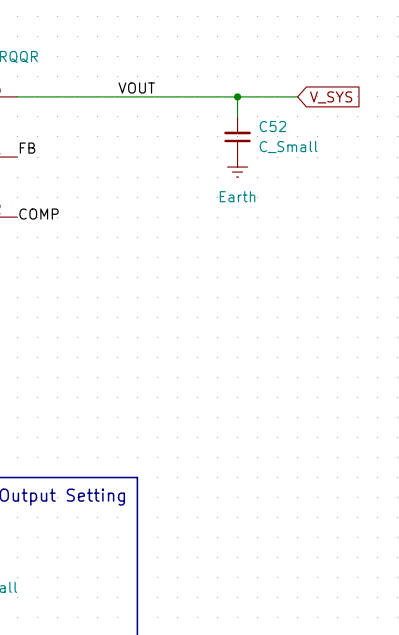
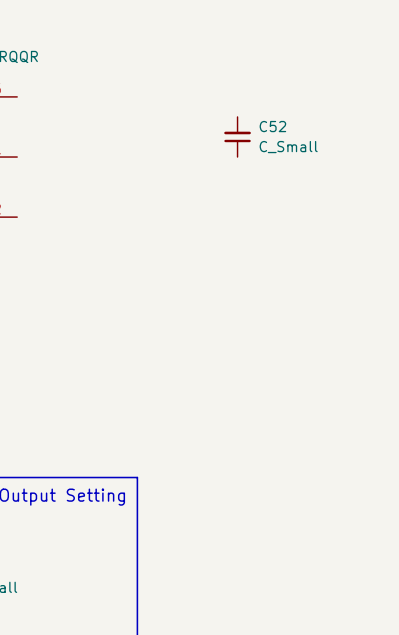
label: VOUT (136, 87) -> none
wire: (17, 96) (297, 96) -> none
wire: (237, 96) (237, 116) -> none
junction: (237, 96) -> none
global label: V_SYS (331, 97) -> none
label: FB (27, 148) -> none
power symbol: Earth (237, 167) -> none
label: COMP (38, 214) -> none

